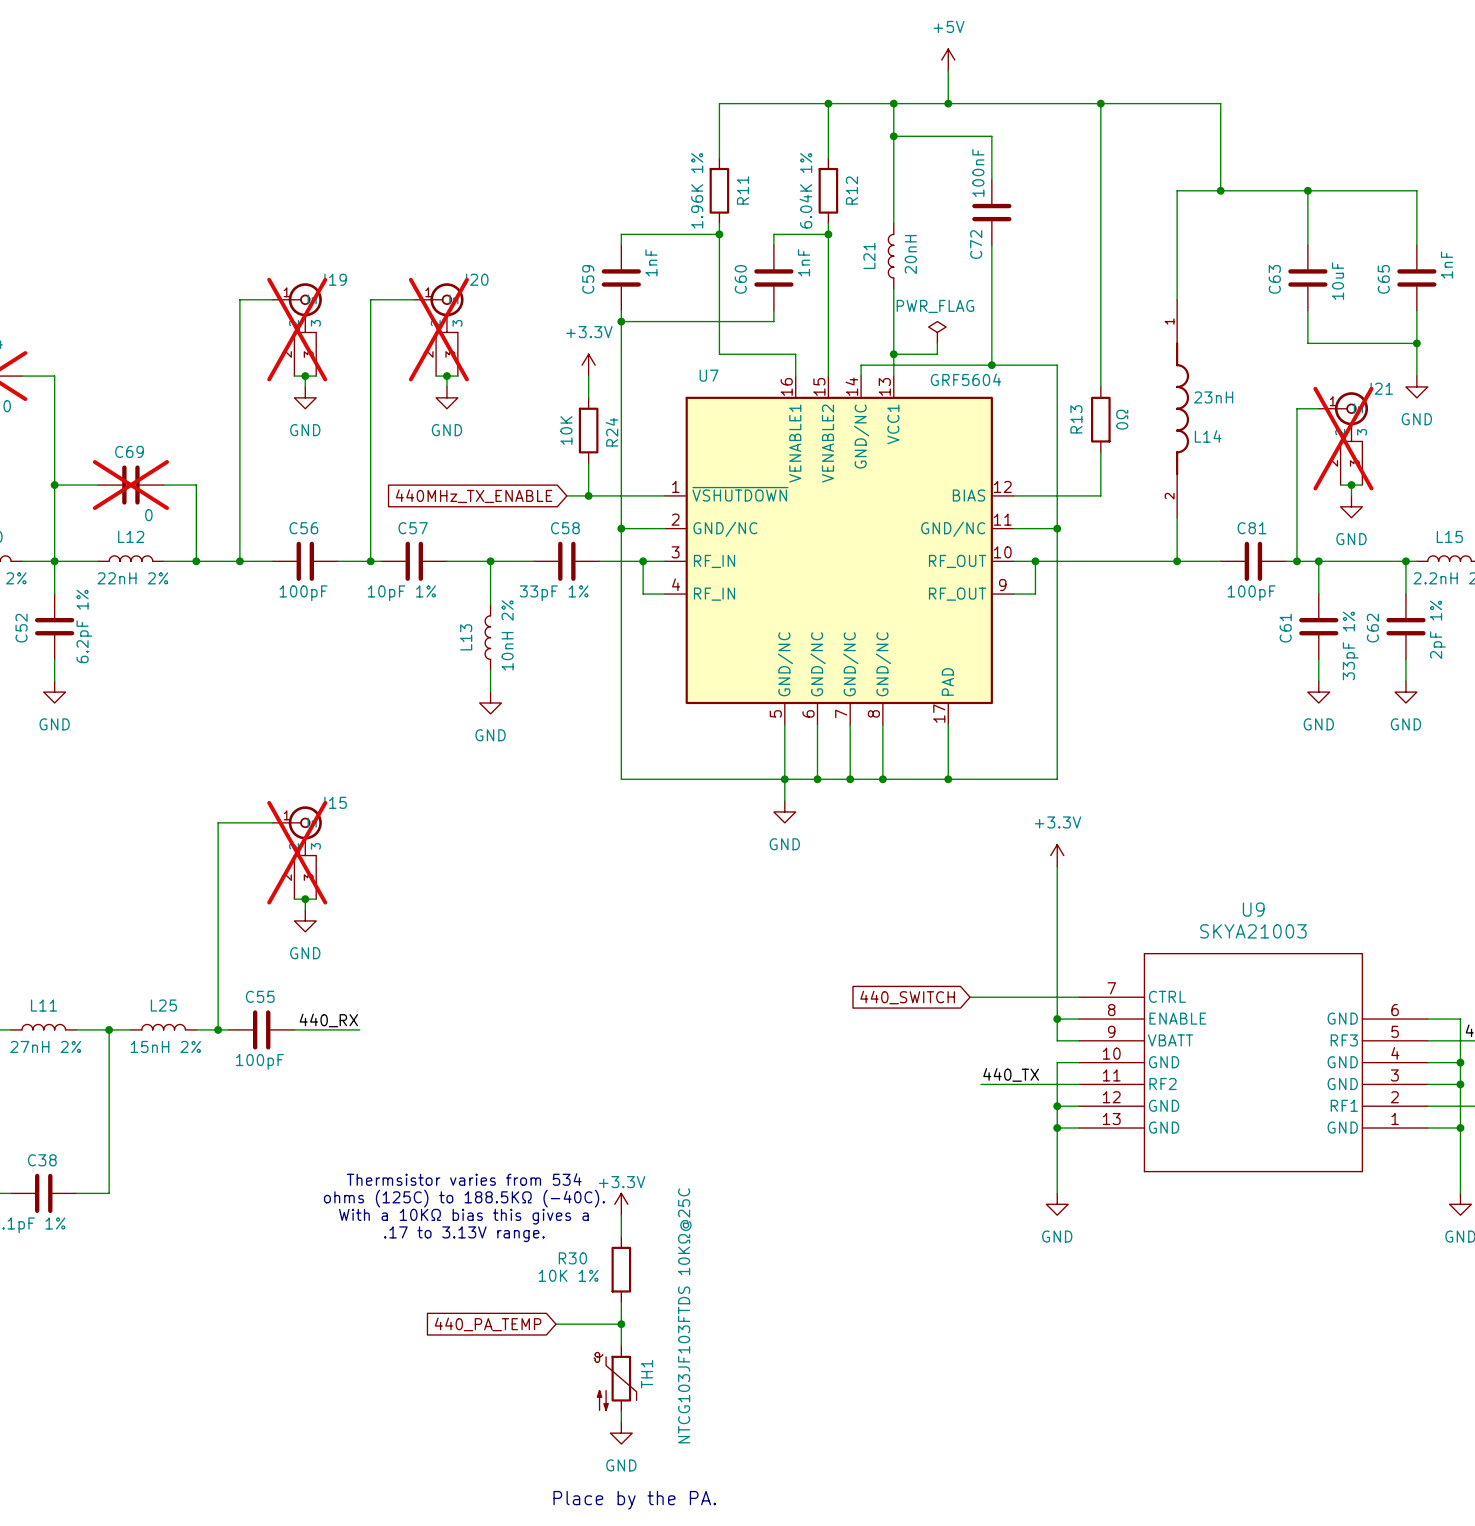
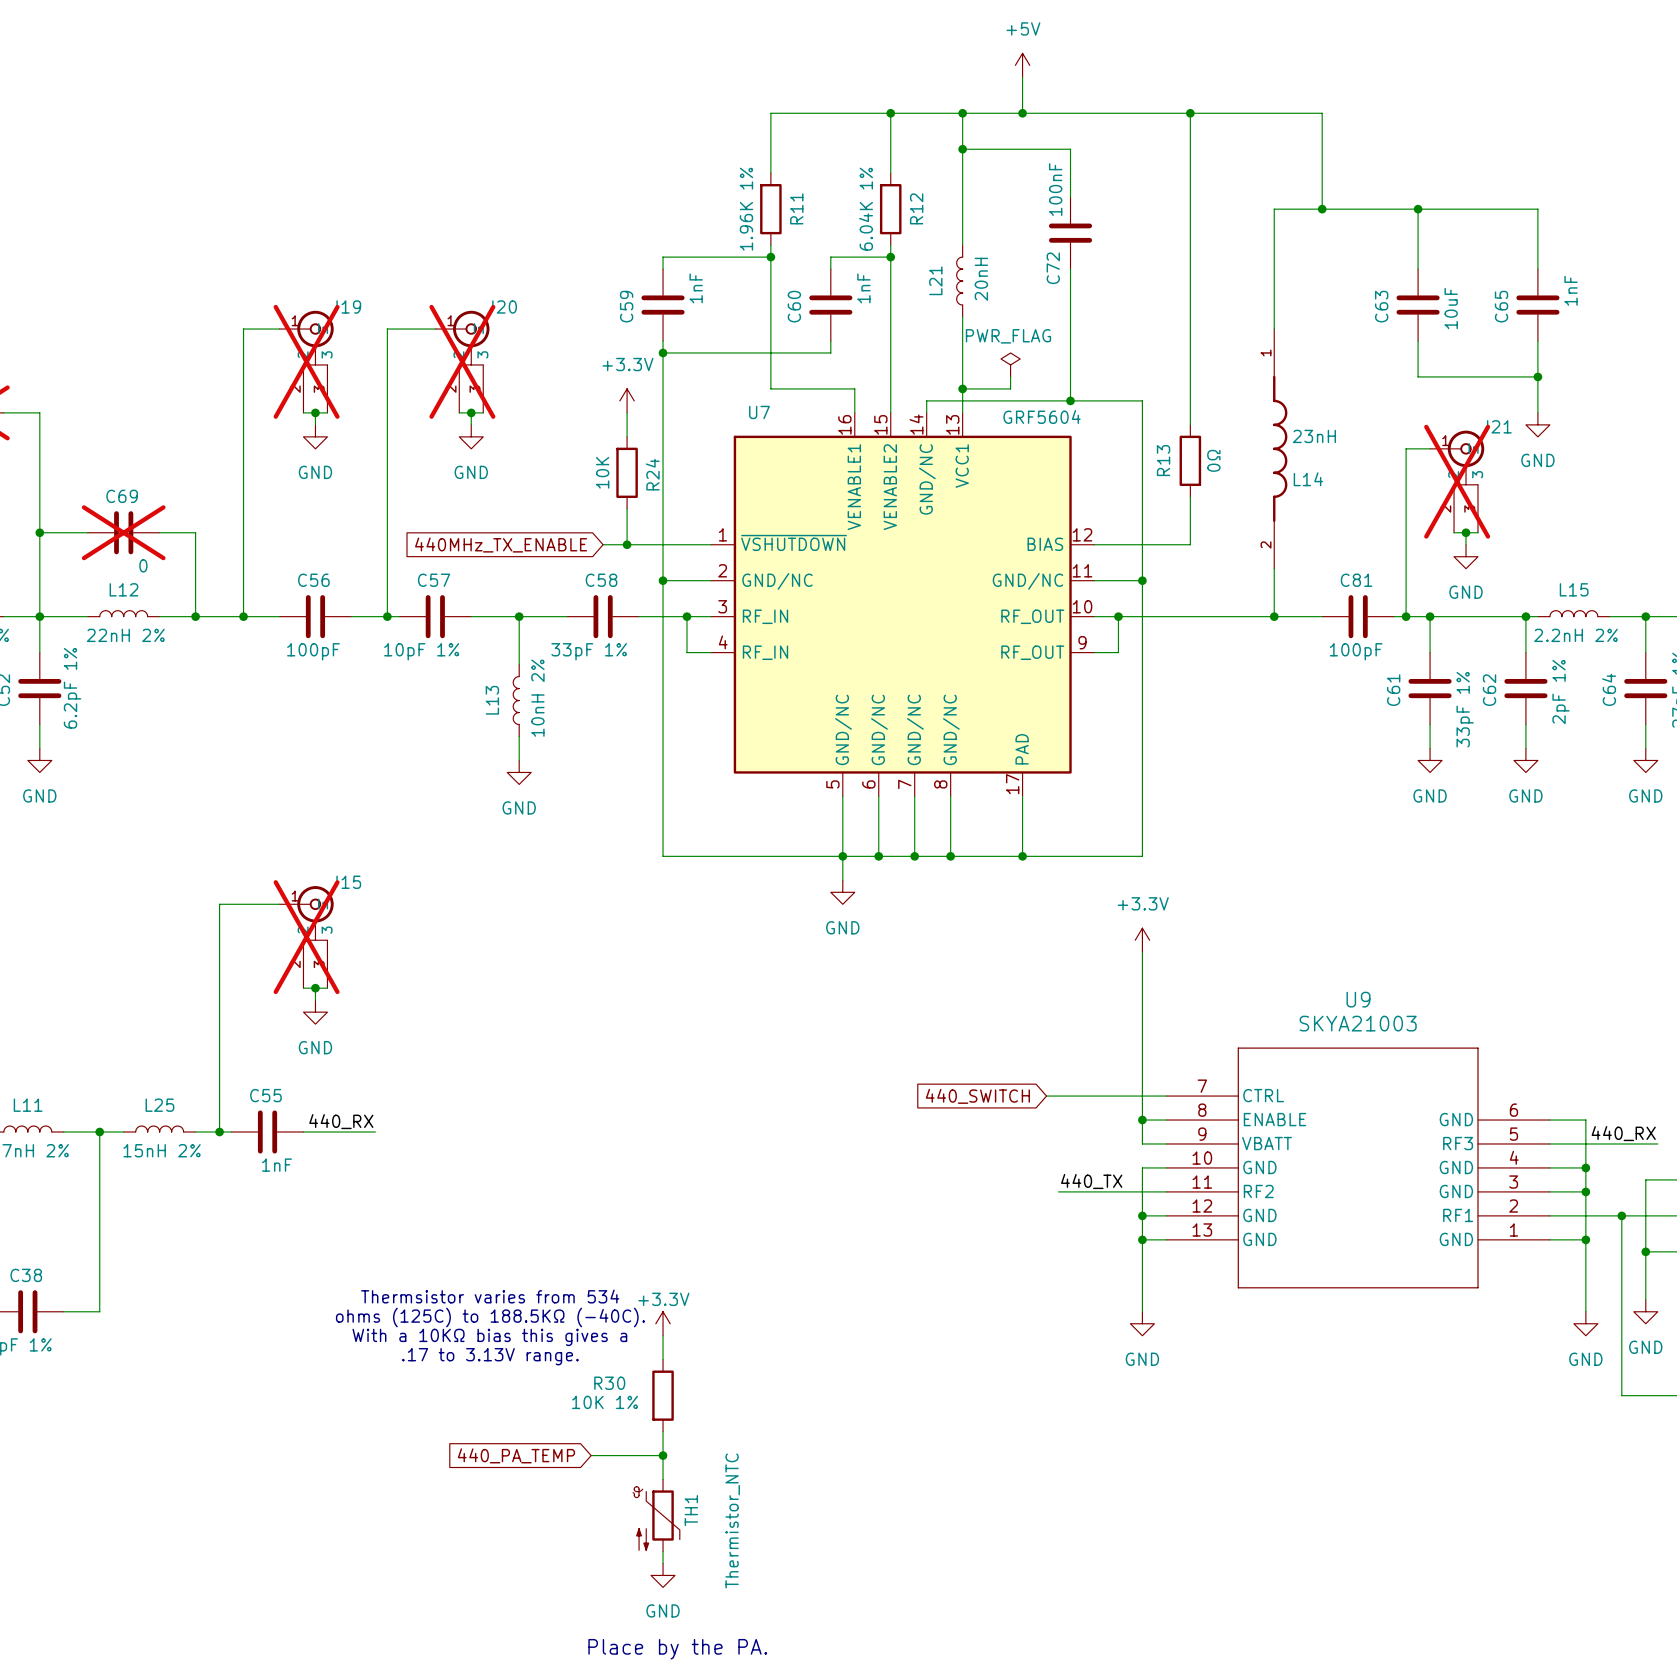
C55 value: 100pF (259, 1061) -> 1nF (276, 1165)
TH1 value: NTCG103JF103FTDS 10KΩ@25C (684, 1315) -> Thermistor_NTC (732, 1520)

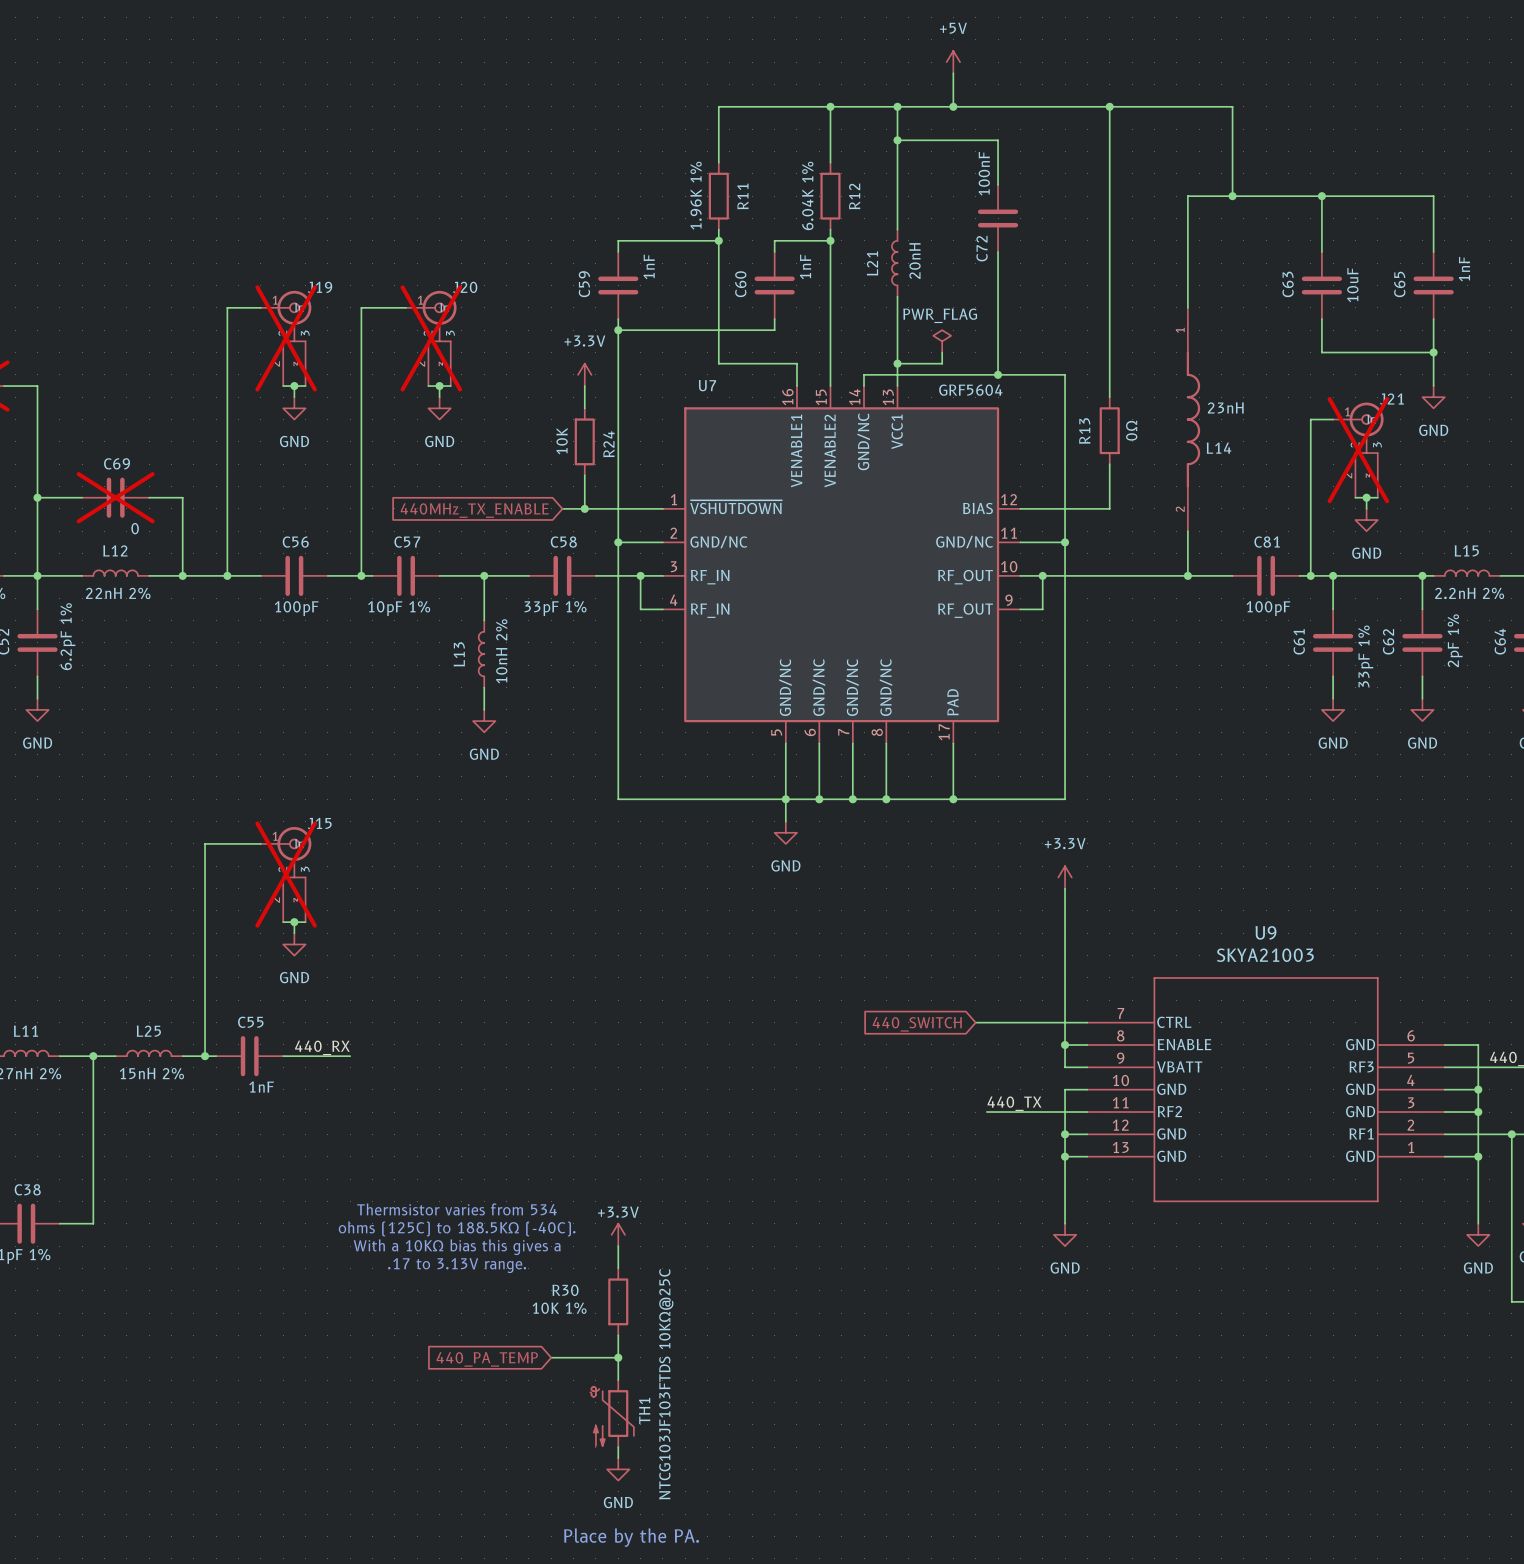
TH1 value: Thermistor_NTC (732, 1520) -> NTCG103JF103FTDS 10KΩ@25C (666, 1384)

